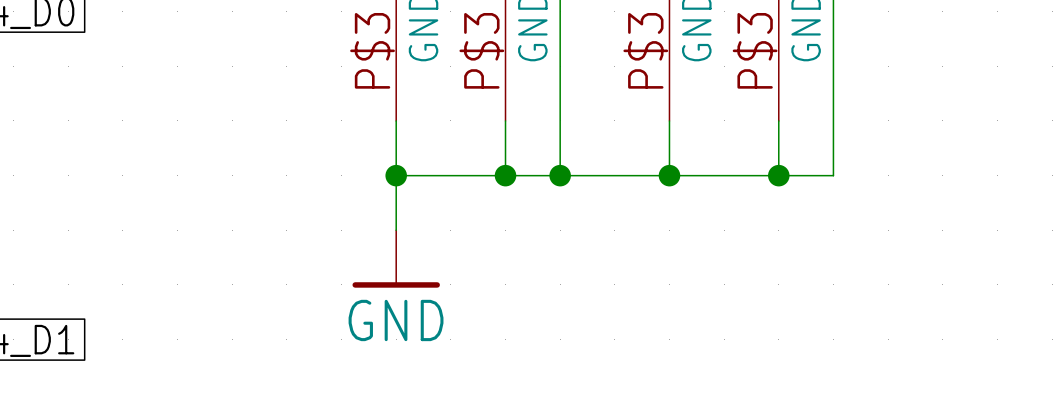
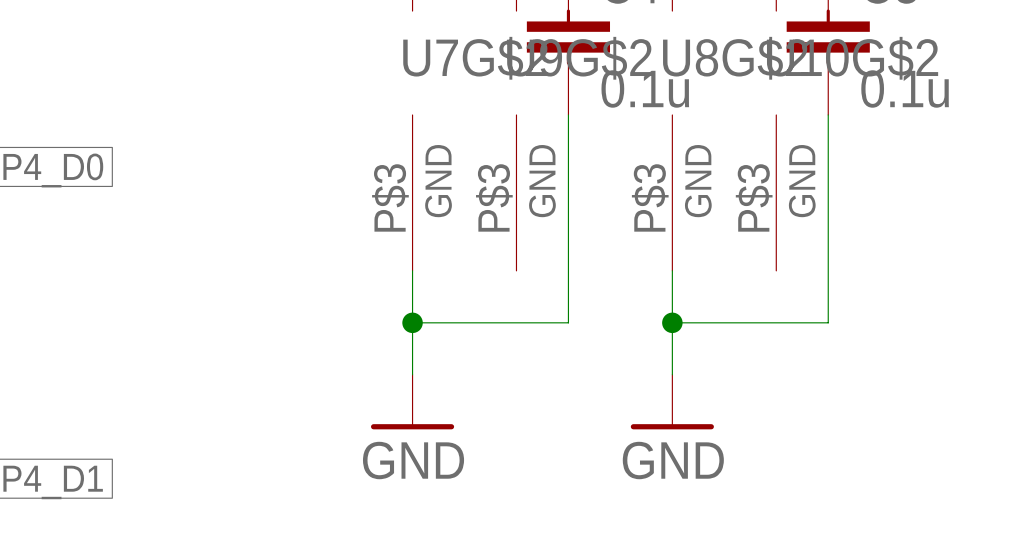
wire: (505, 120) (505, 175) -> none
wire: (778, 120) (778, 175) -> none
junction: (505, 175) -> none
wire: (560, 175) (669, 175) -> (672, 374) (672, 322)
junction: (560, 175) -> none
junction: (778, 175) -> none
power symbol: none -> GND (672, 402)

